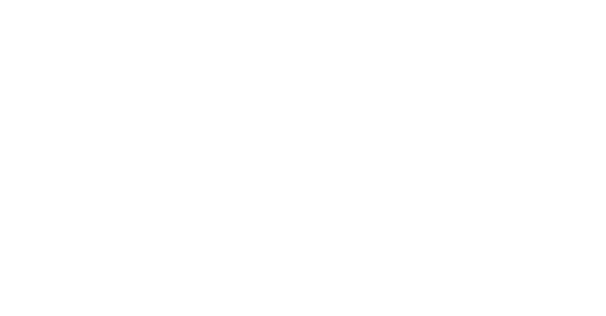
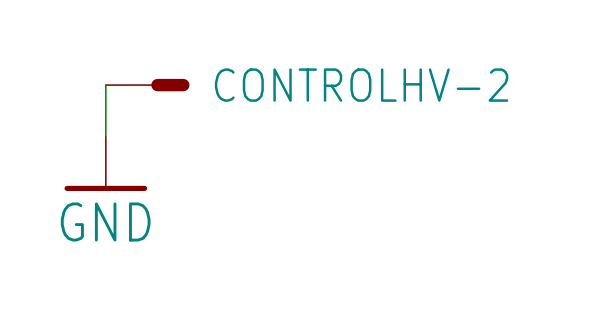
wire: none -> (105, 85) (105, 136)
CONTROLHV-2: none -> (147, 85)
power symbol: none -> GND (105, 163)

